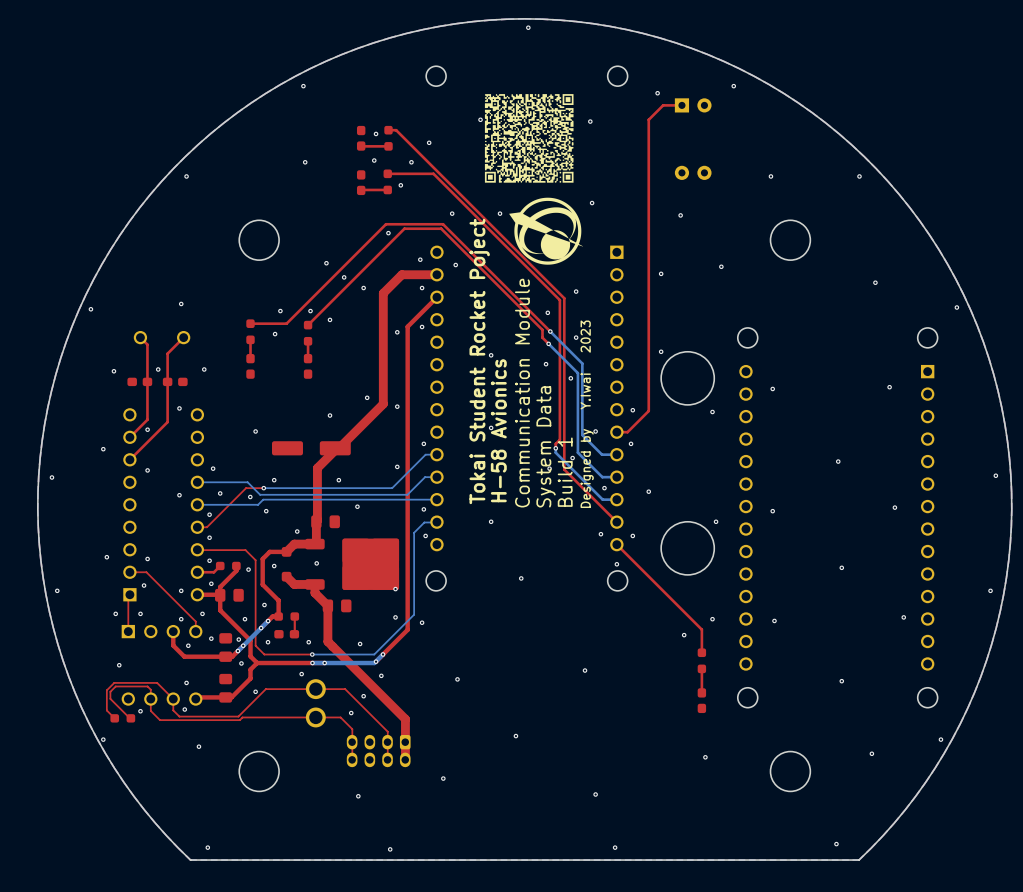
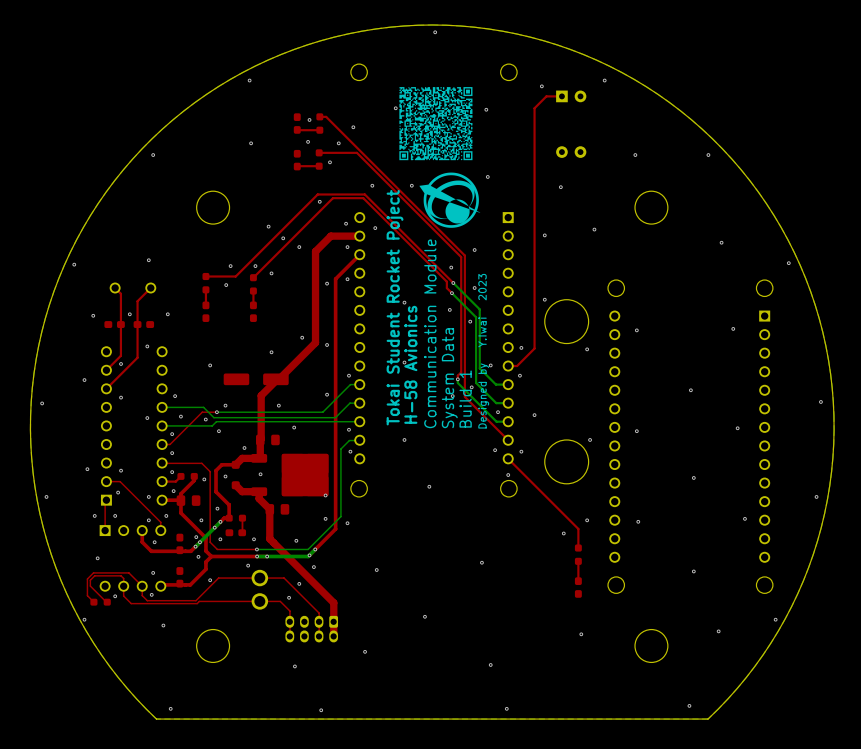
part footprint: [219, 633, 233, 662] -> [176, 533, 184, 555]
via: (211, 638) -> none
part footprint: [219, 673, 233, 703] -> [176, 567, 184, 588]

